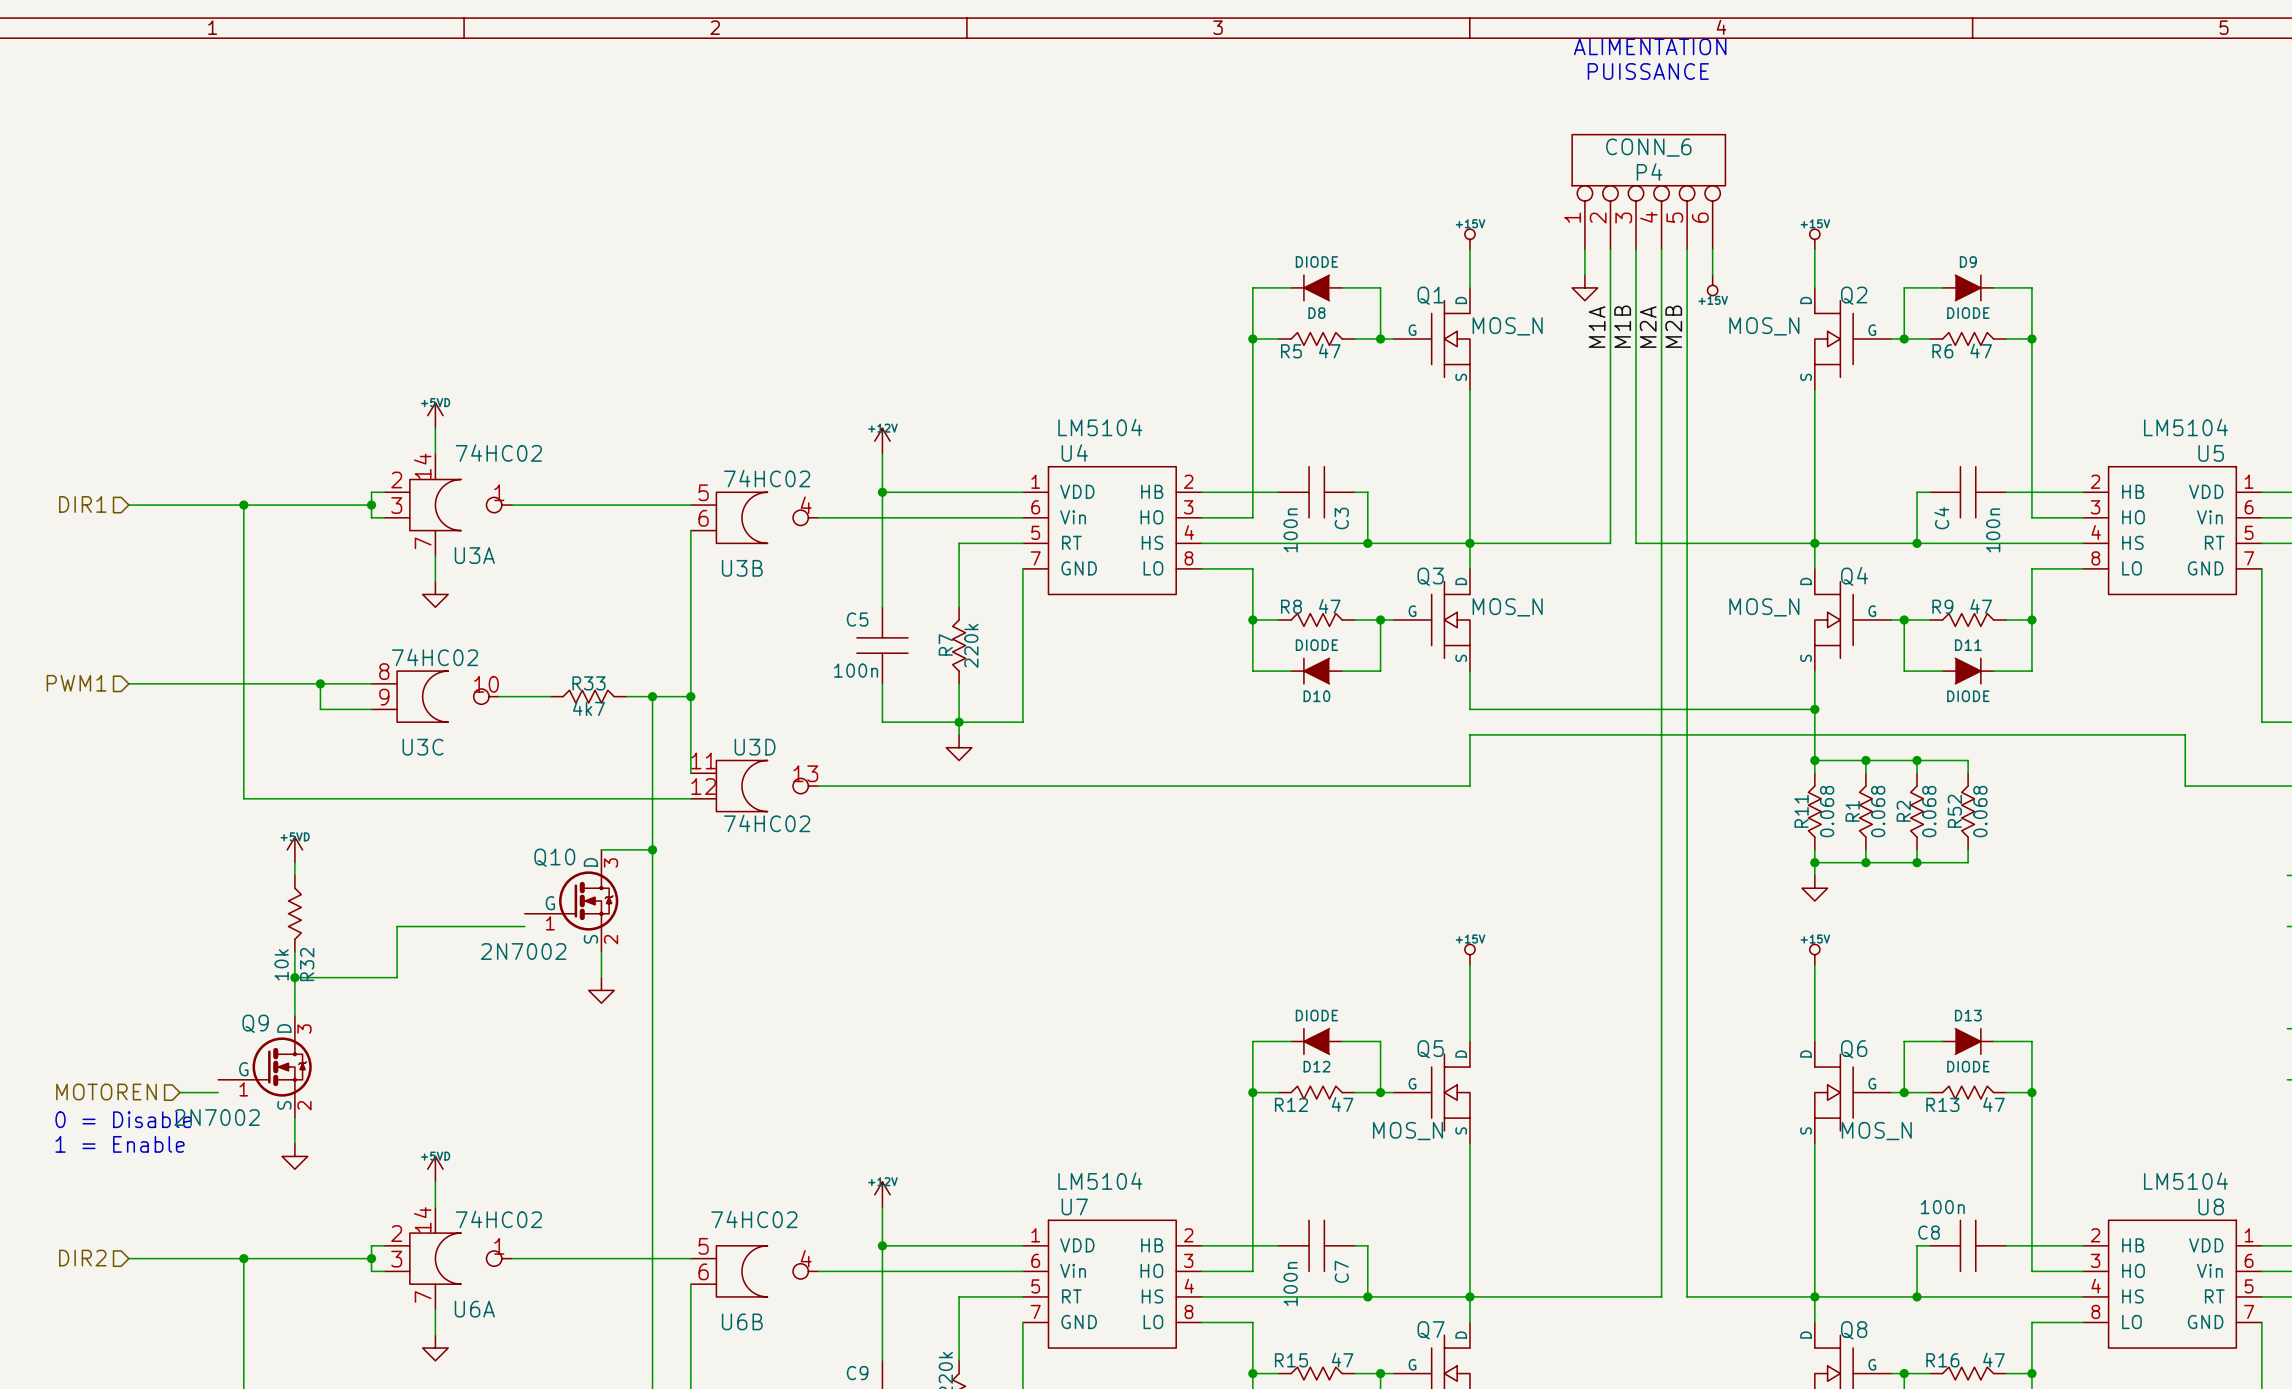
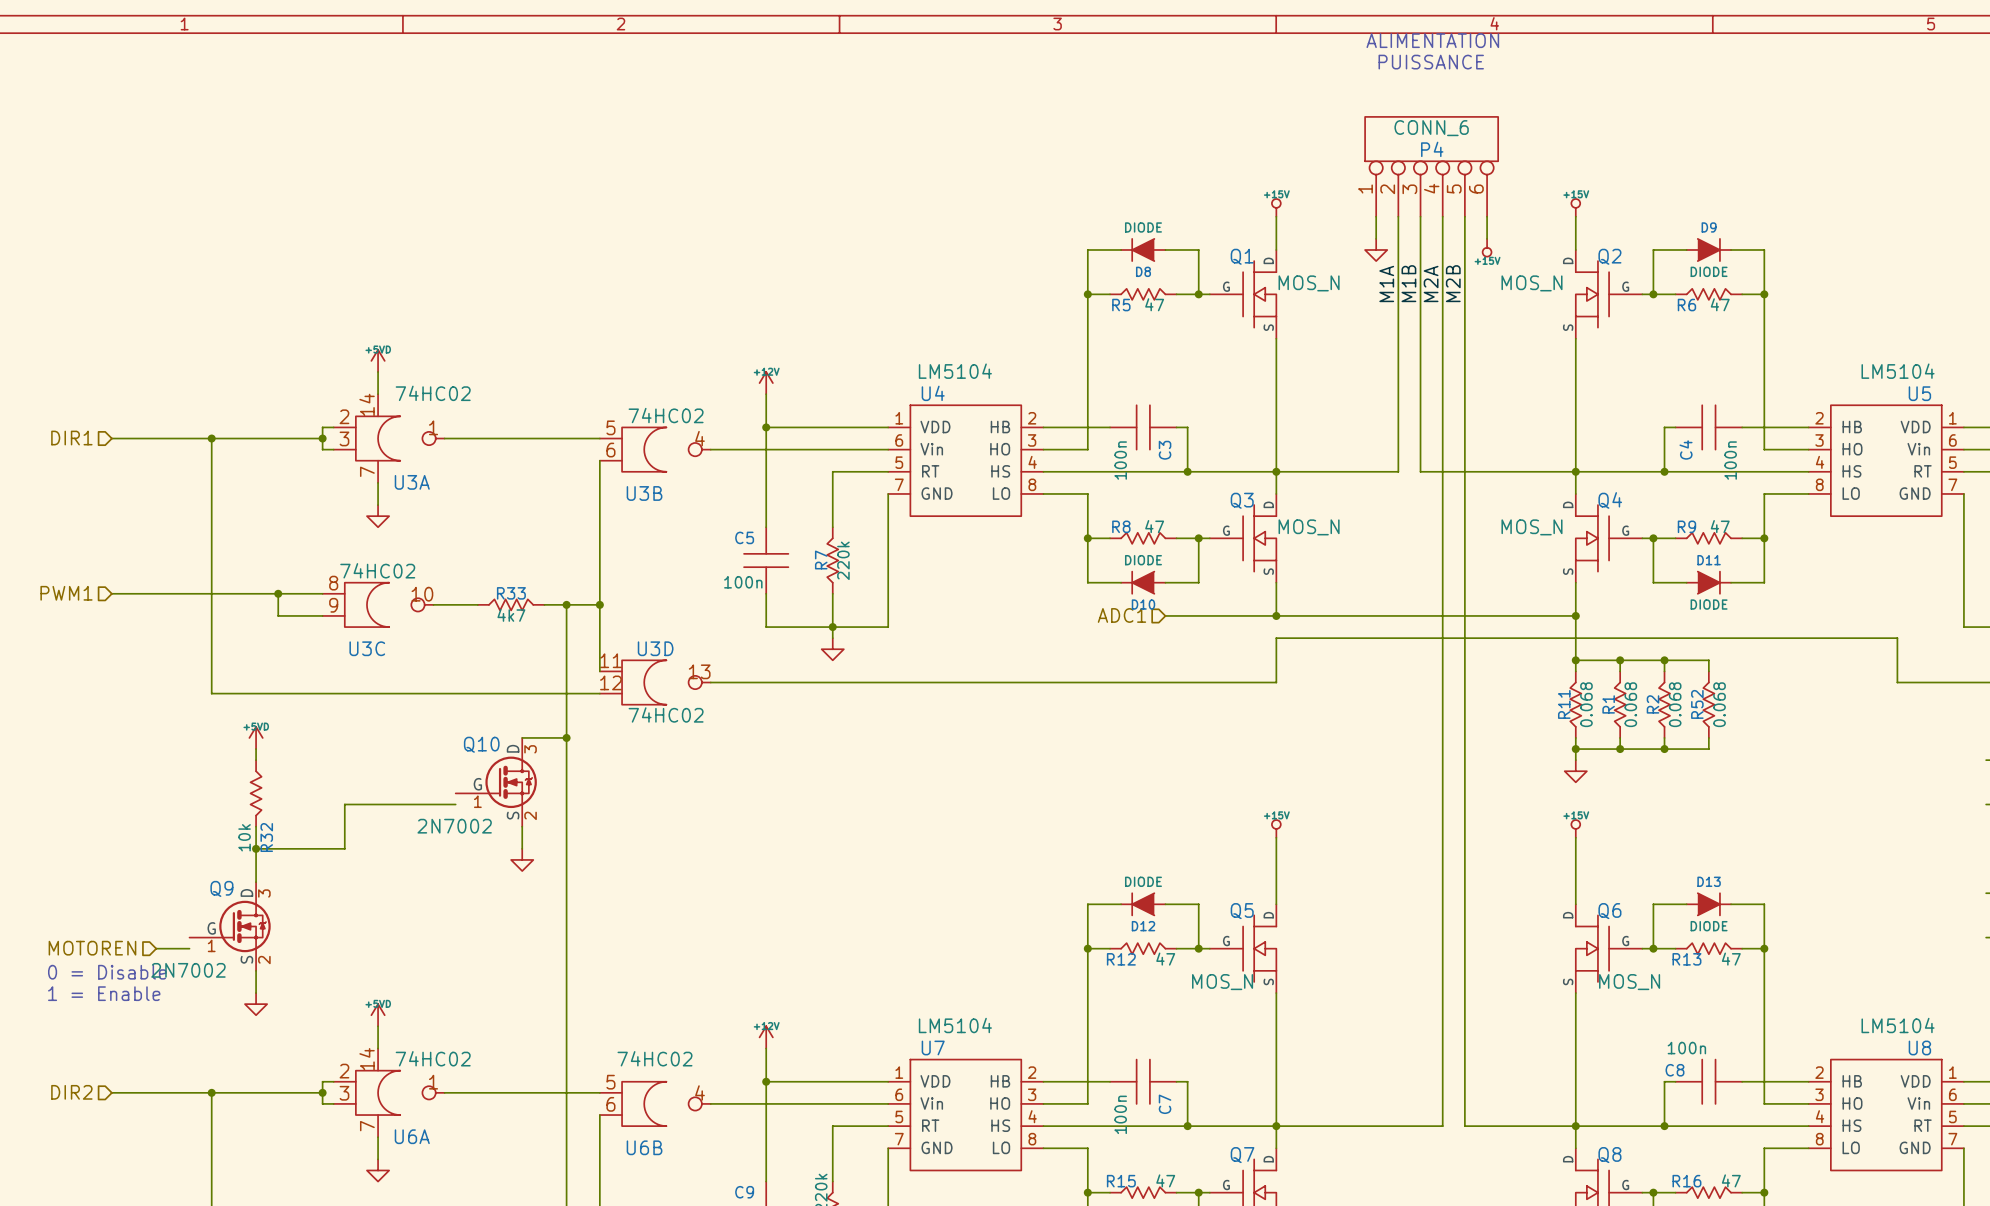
hierarchical label: none -> ADC1 (1121, 615)
wire: none -> (1165, 615) (1276, 615)
junction: none -> (1276, 615)

